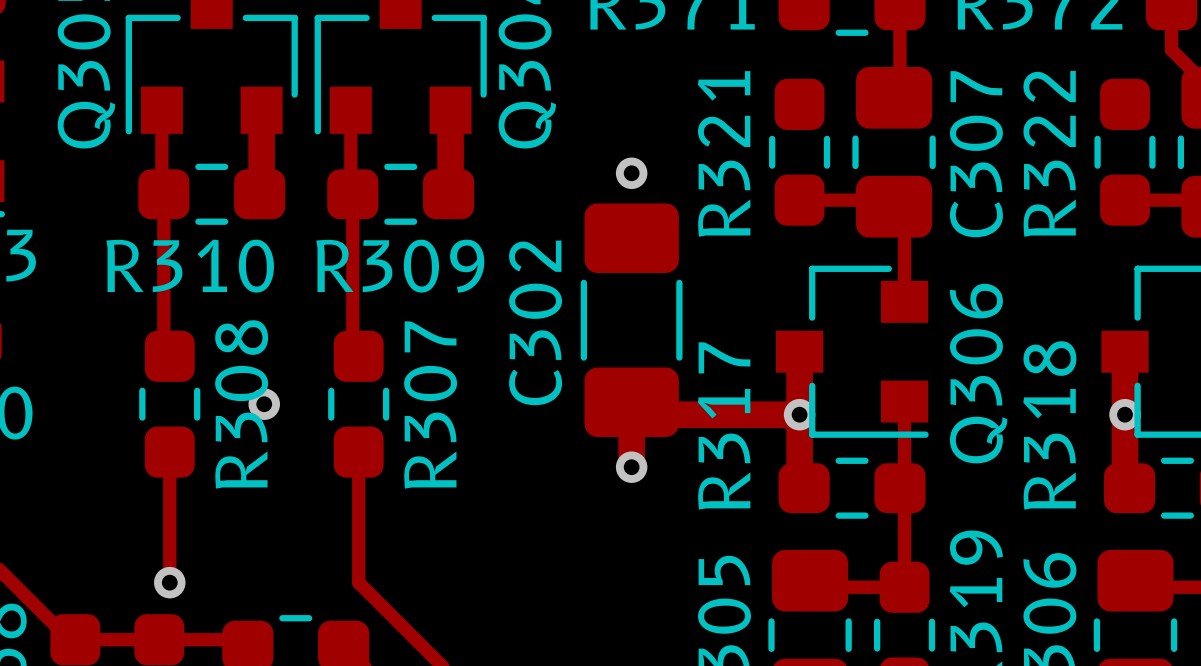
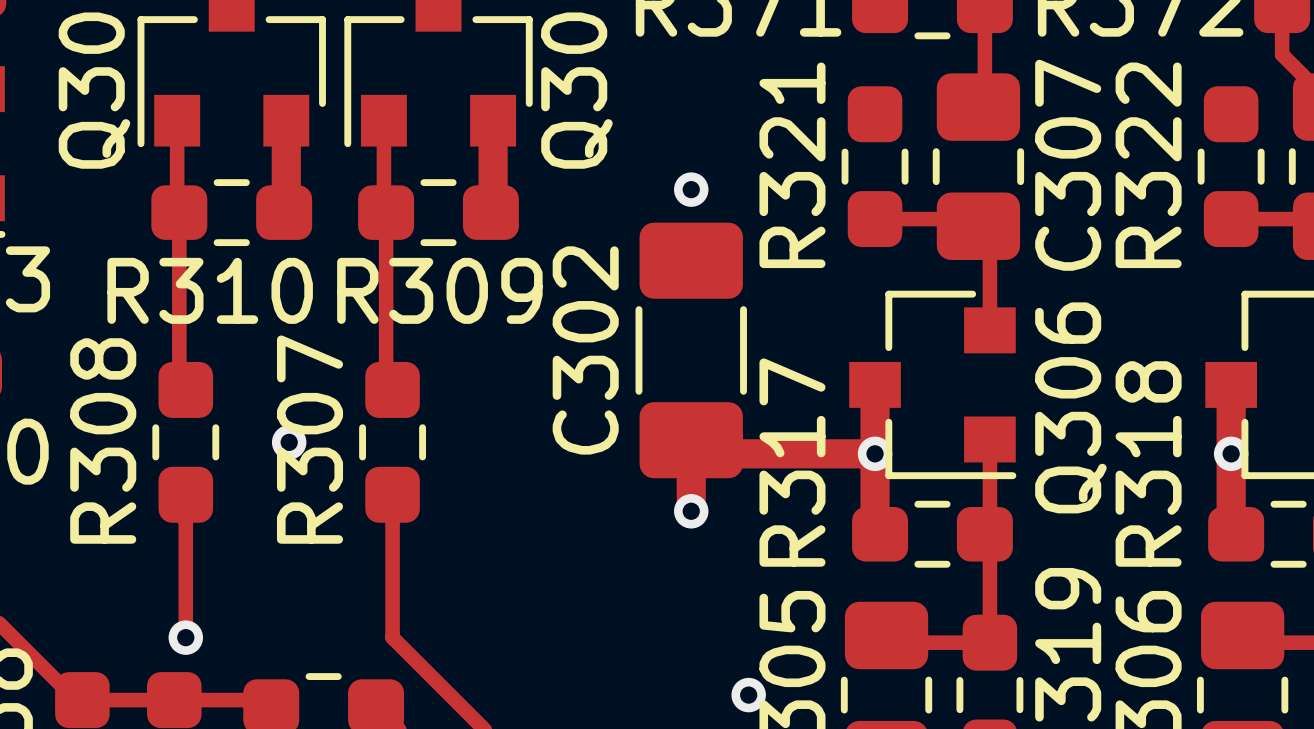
R308 name position: R308 (241, 404) -> R308 (103, 440)
R307 name position: R307 (430, 404) -> R307 (310, 439)
via: none -> (748, 695)

